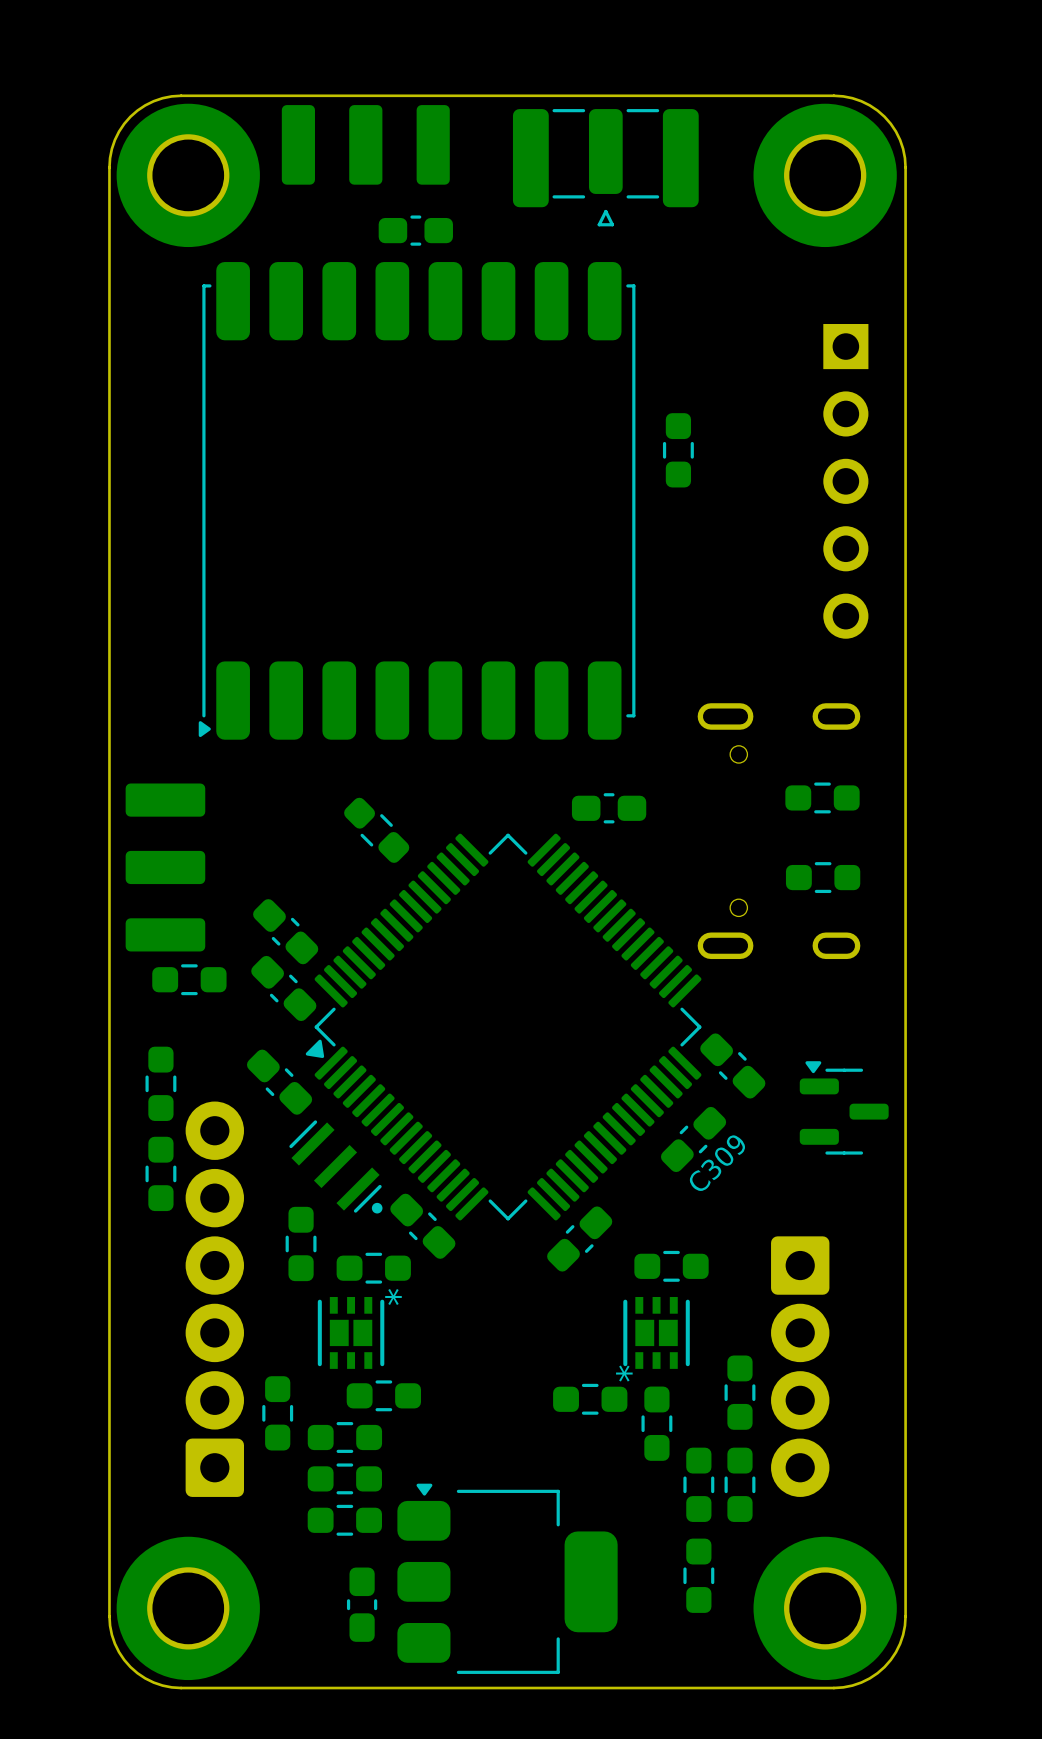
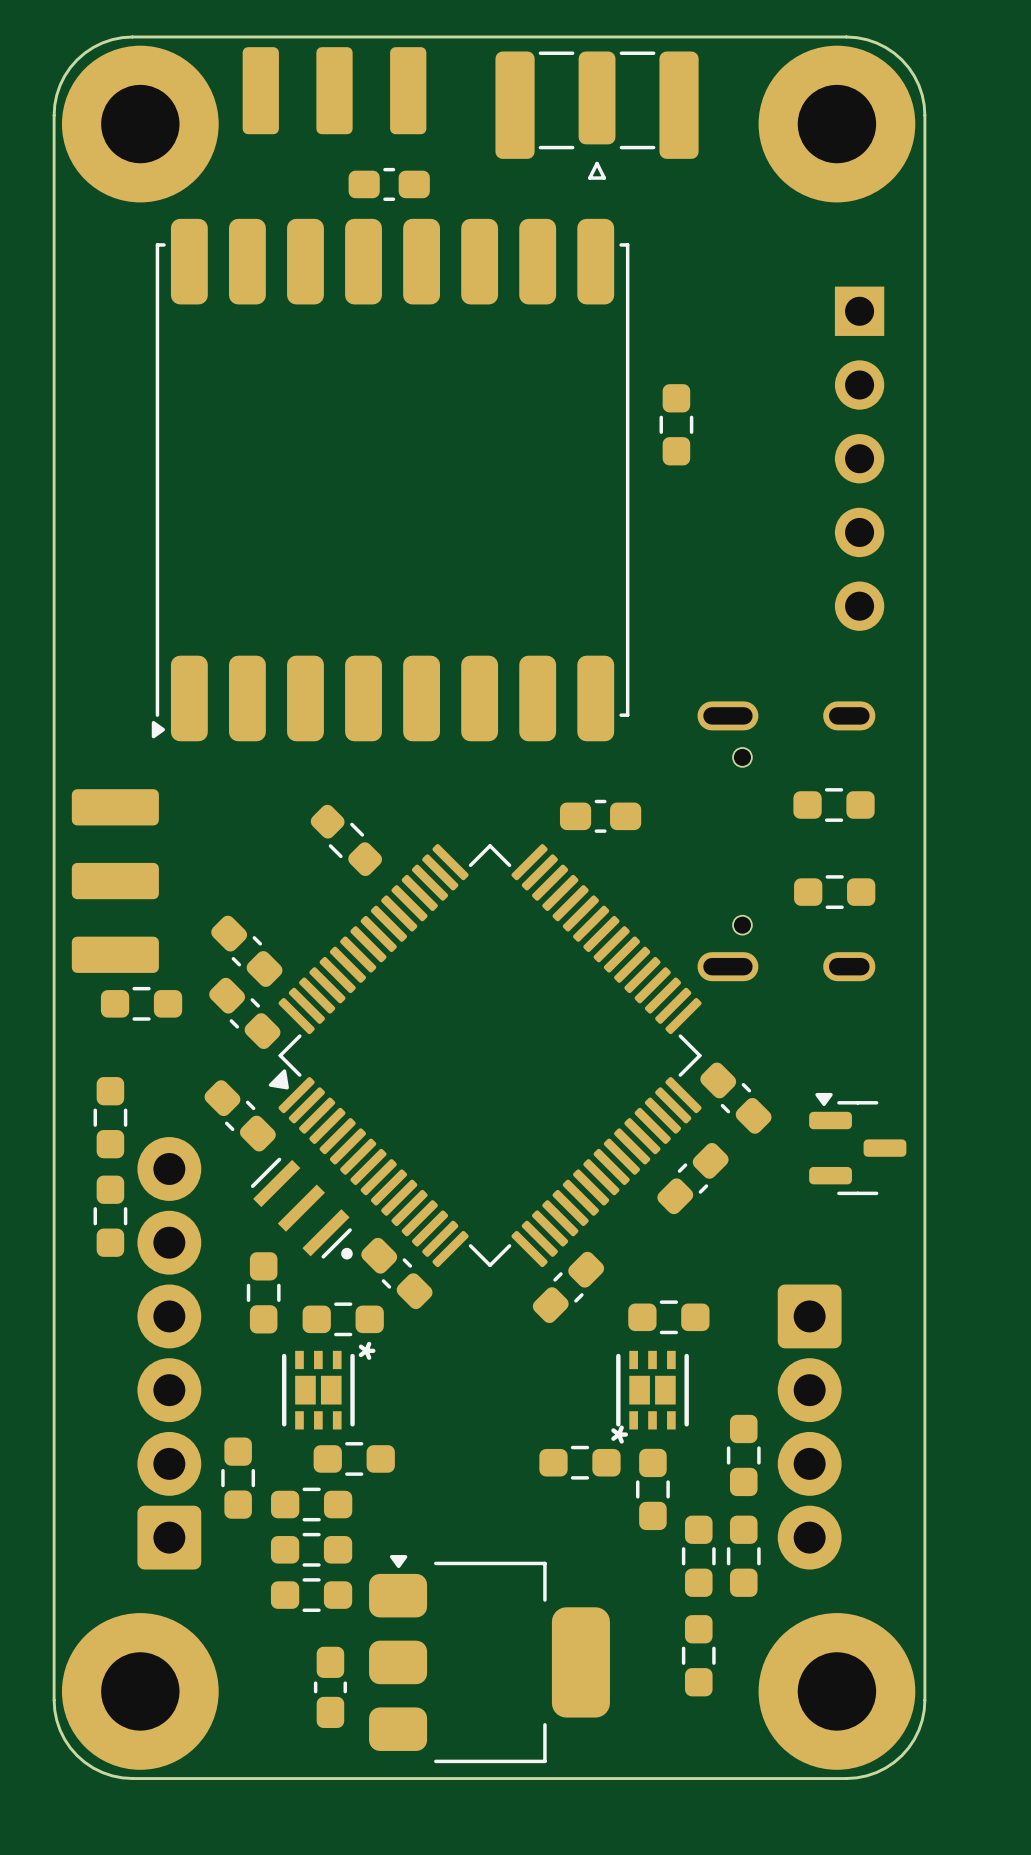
C309 name: C309 (717, 1162) -> none

